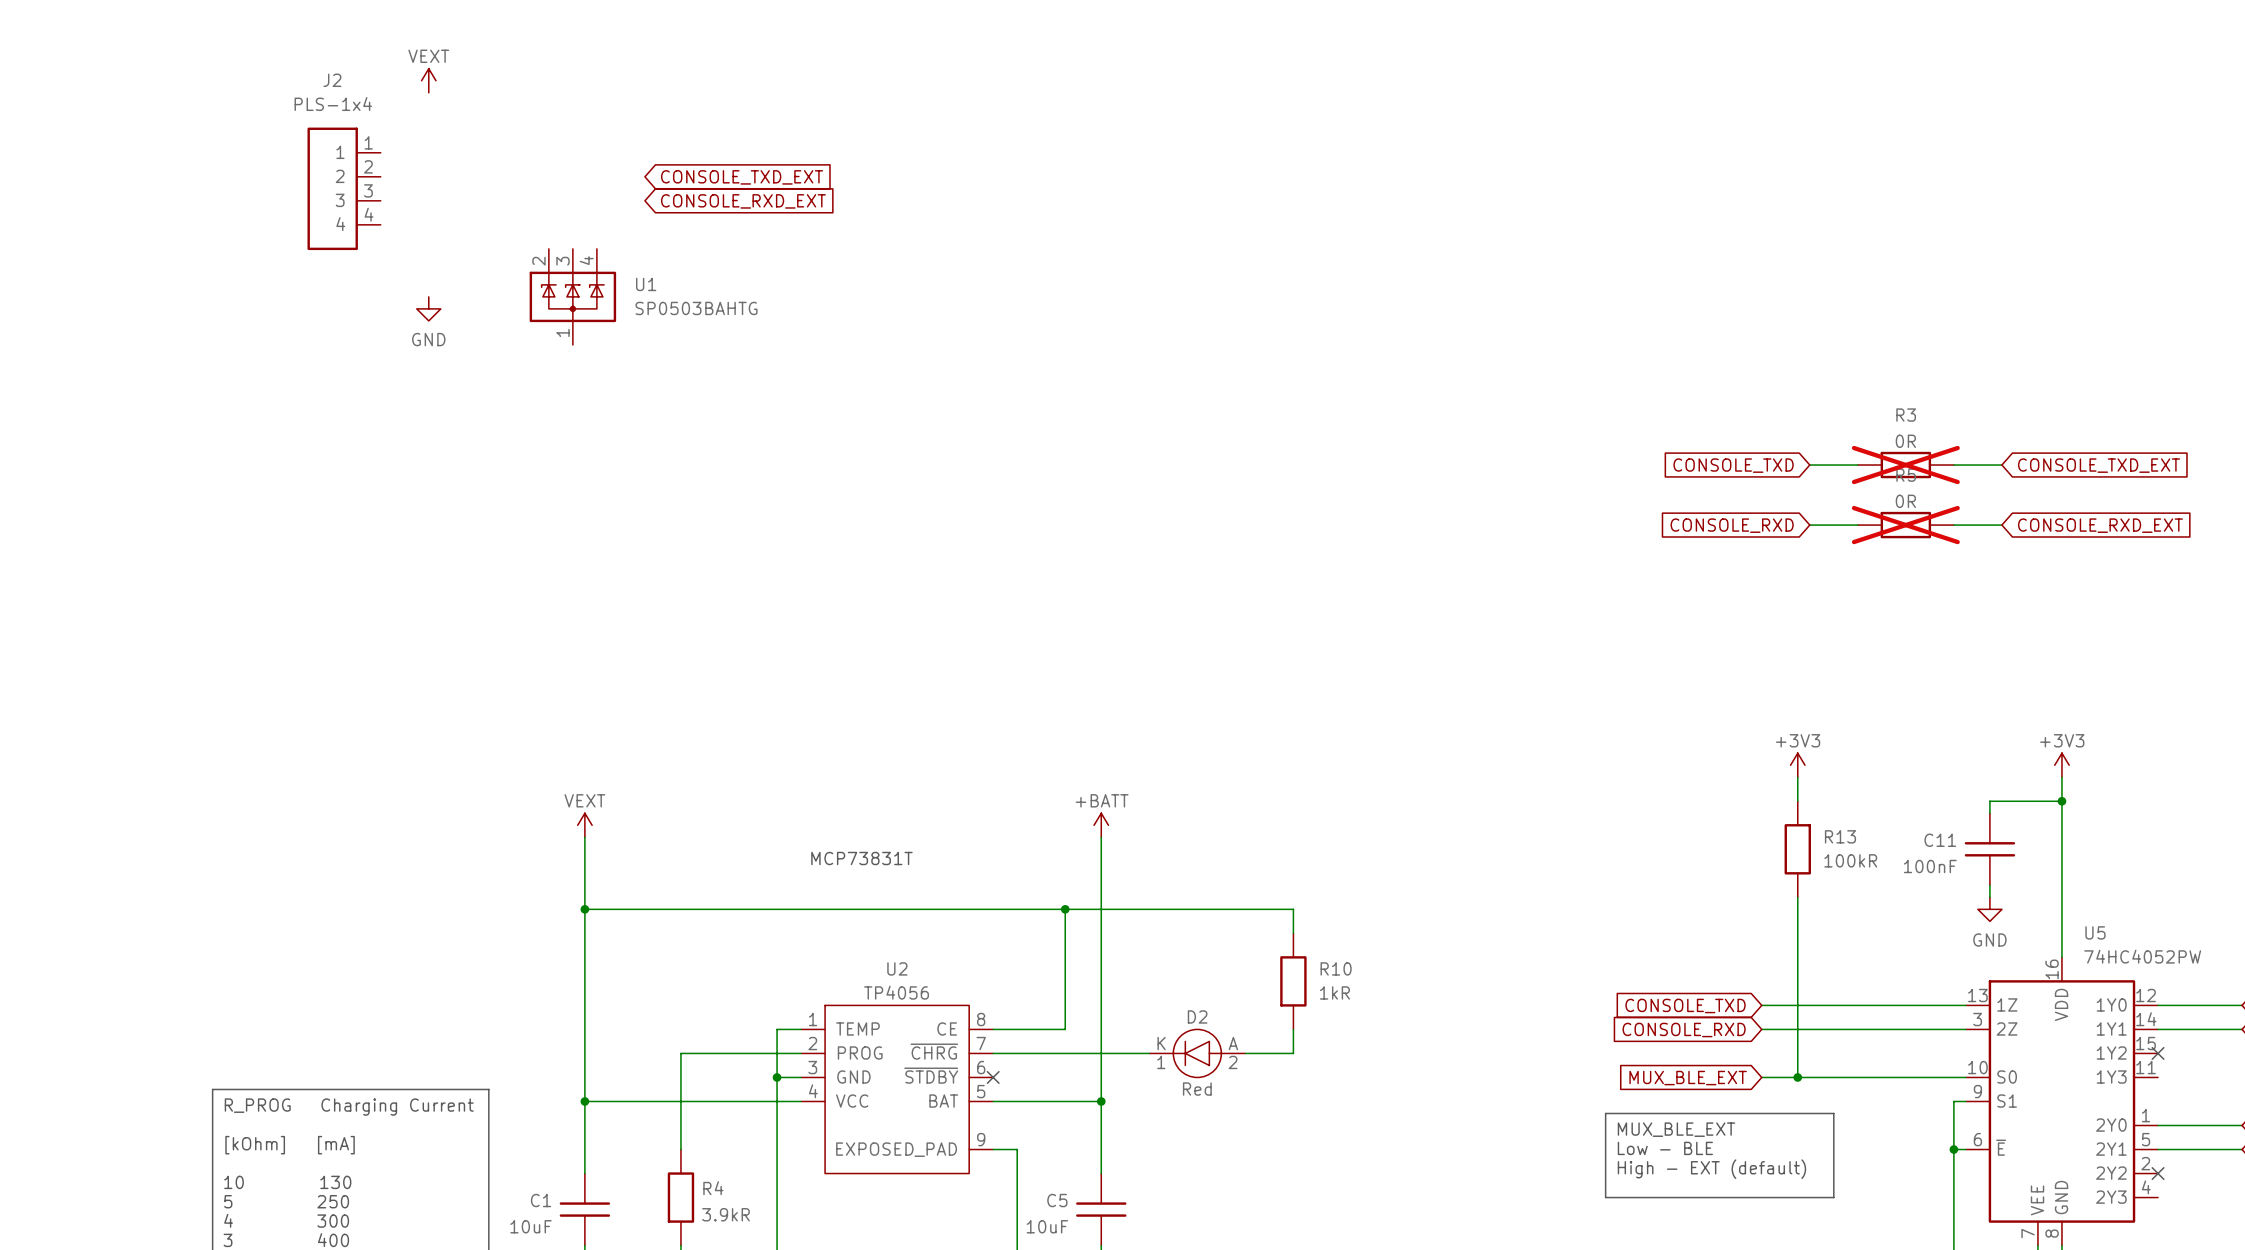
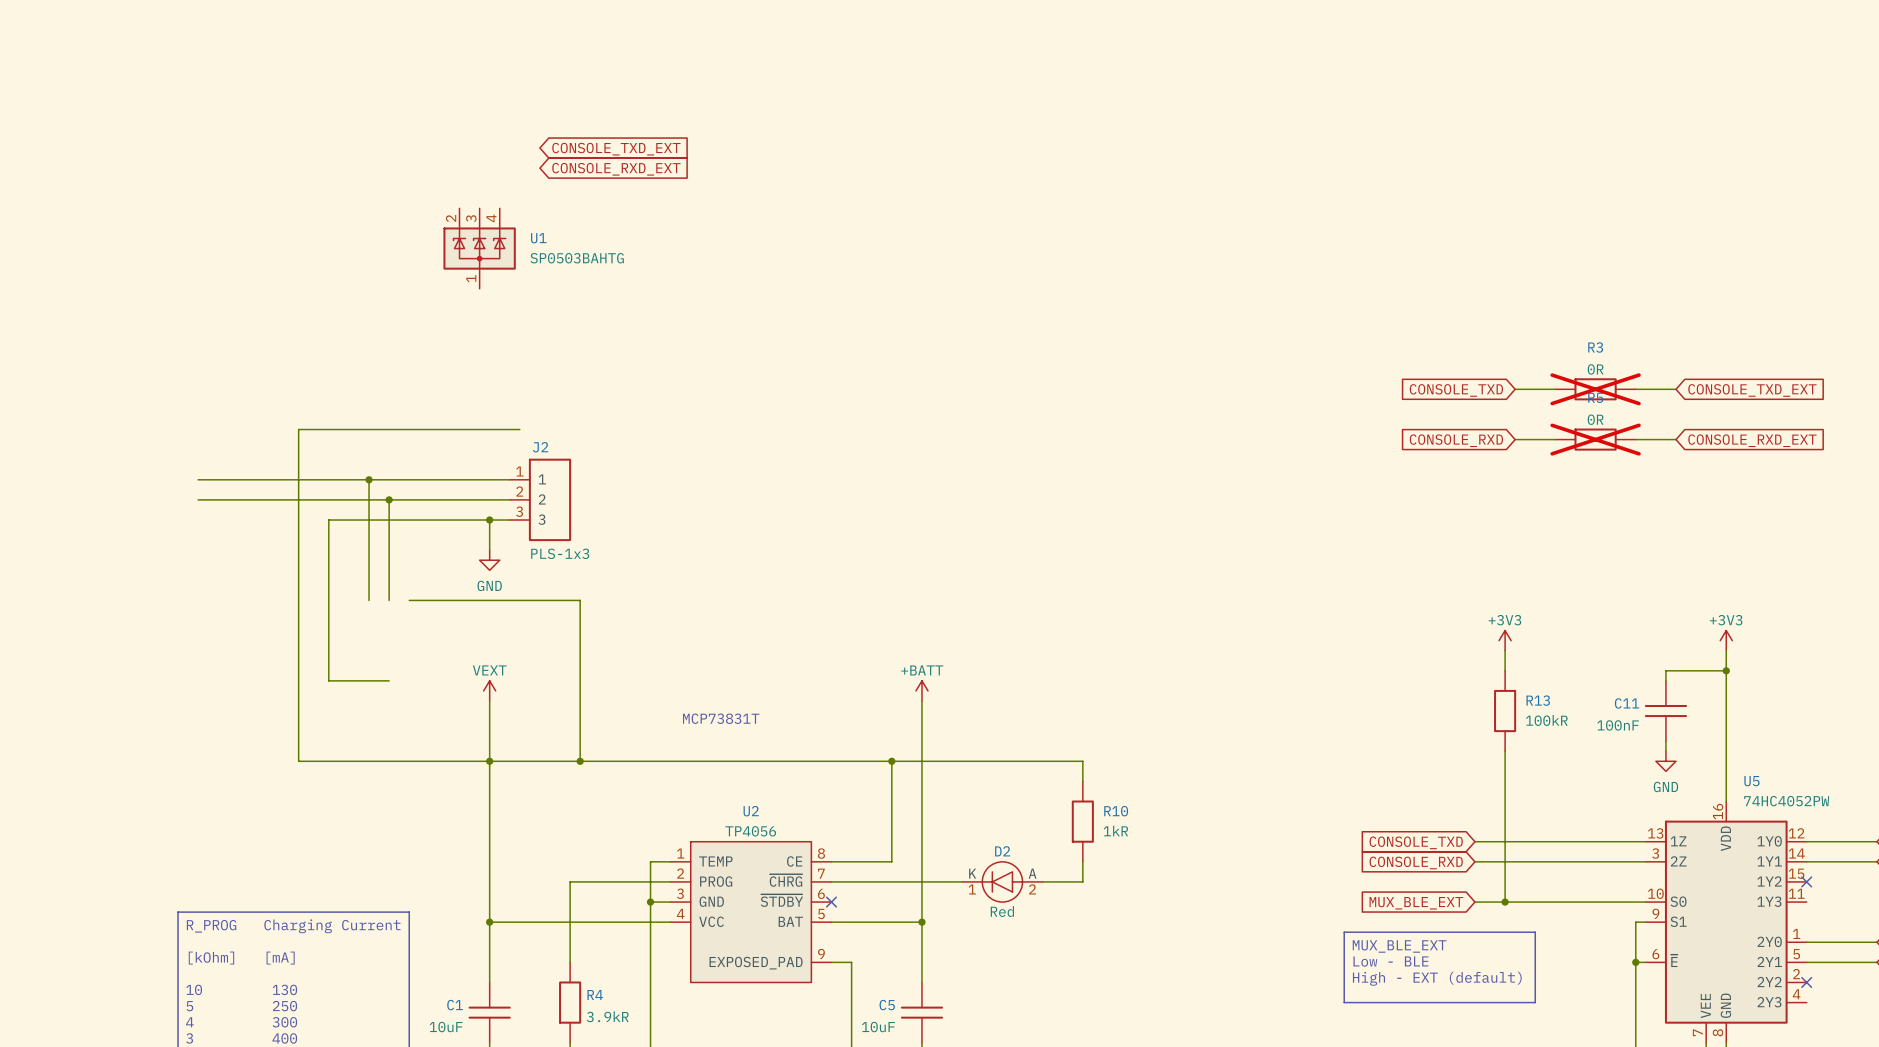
J2 name position: J2 (332, 80) -> J2 (540, 447)
power symbol: VEXT (428, 80) -> none
J2 value: PLS-1x4 (333, 104) -> PLS-1x3 (560, 553)
J2 symbol: [307, 127, 381, 251] -> [509, 458, 572, 542]
power symbol: GND (428, 308) -> none
wire: none -> (519, 429) (298, 429) (298, 761) (489, 761)
wire: none -> (198, 479) (509, 479)
wire: none -> (369, 479) (369, 600)
junction: none -> (369, 479)
wire: none -> (198, 499) (509, 499)
wire: none -> (389, 499) (389, 600)
junction: none -> (389, 499)
wire: none -> (489, 520) (489, 550)
junction: none -> (489, 520)
wire: none -> (509, 520) (328, 520) (328, 680) (389, 680)
power symbol: none -> GND (489, 560)
wire: none -> (409, 600) (580, 600) (580, 761)
junction: none -> (580, 761)

